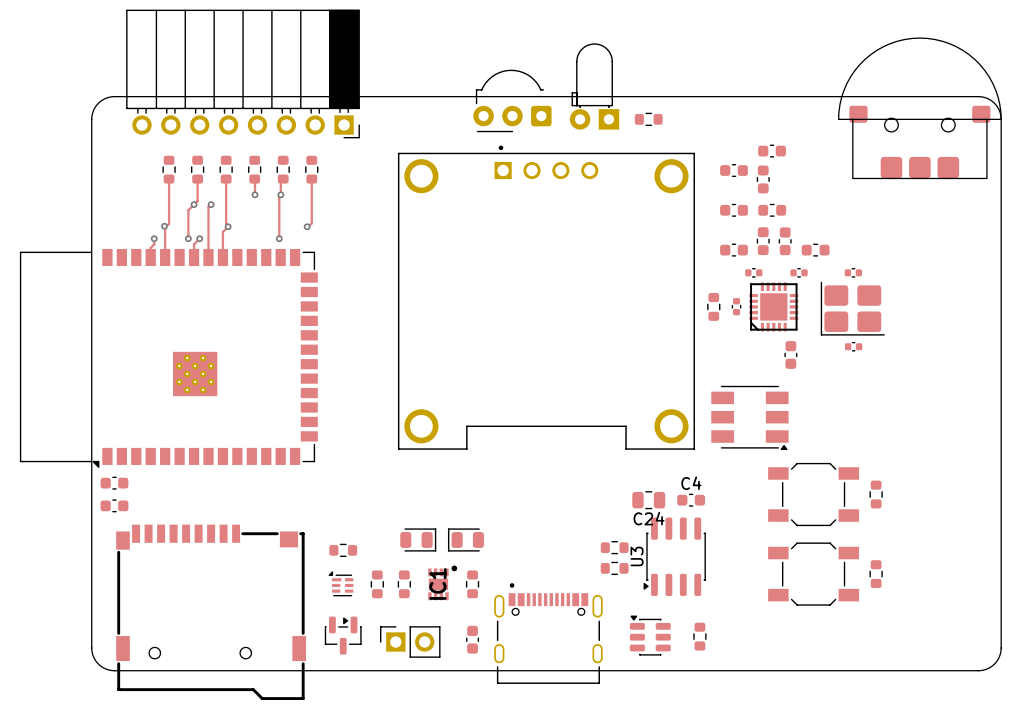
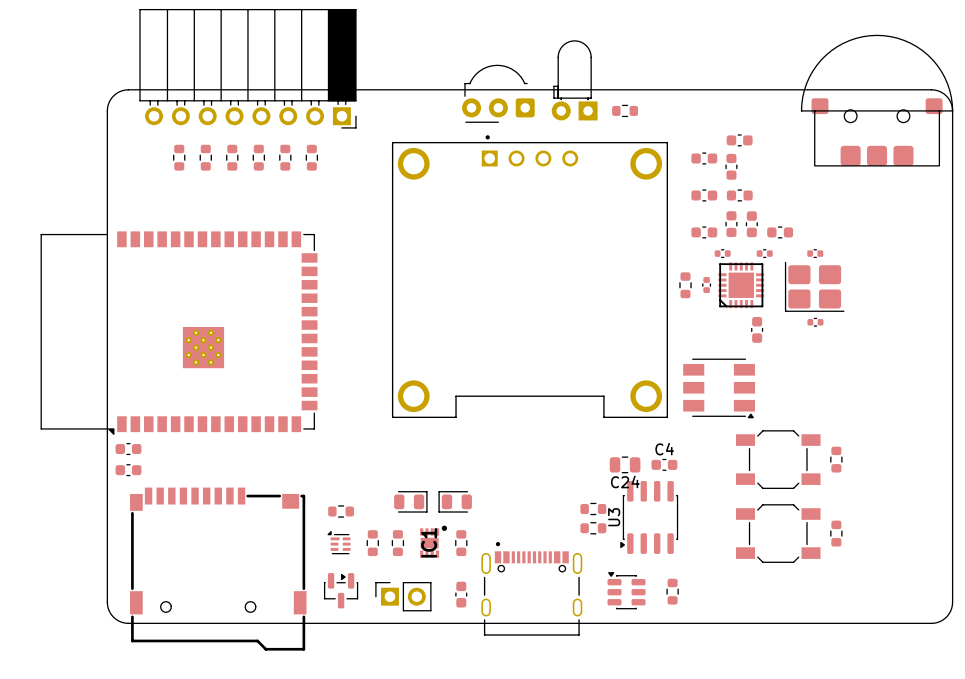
track: (169, 179) (169, 223) (164, 226) (165, 257) -> none
track: (197, 179) (197, 201) (188, 210) (188, 238) -> none
track: (226, 179) (226, 223) (228, 226) (222, 232) (222, 257) -> none
track: (254, 179) (255, 194) -> none
track: (283, 179) (280, 181) (279, 196) (279, 238) -> none
track: (311, 179) (311, 223) (307, 226) -> none
via: (255, 194) -> none
via: (280, 194) -> none
via: (194, 204) -> none
track: (211, 204) (208, 207) (208, 257) -> none
via: (211, 204) -> none
via: (164, 226) -> none
via: (228, 226) -> none
via: (307, 226) -> none
track: (154, 238) (154, 244) (150, 247) (150, 257) -> none
via: (154, 238) -> none
via: (188, 238) -> none
track: (199, 238) (194, 244) (194, 257) -> none
via: (199, 238) -> none
via: (279, 238) -> none

